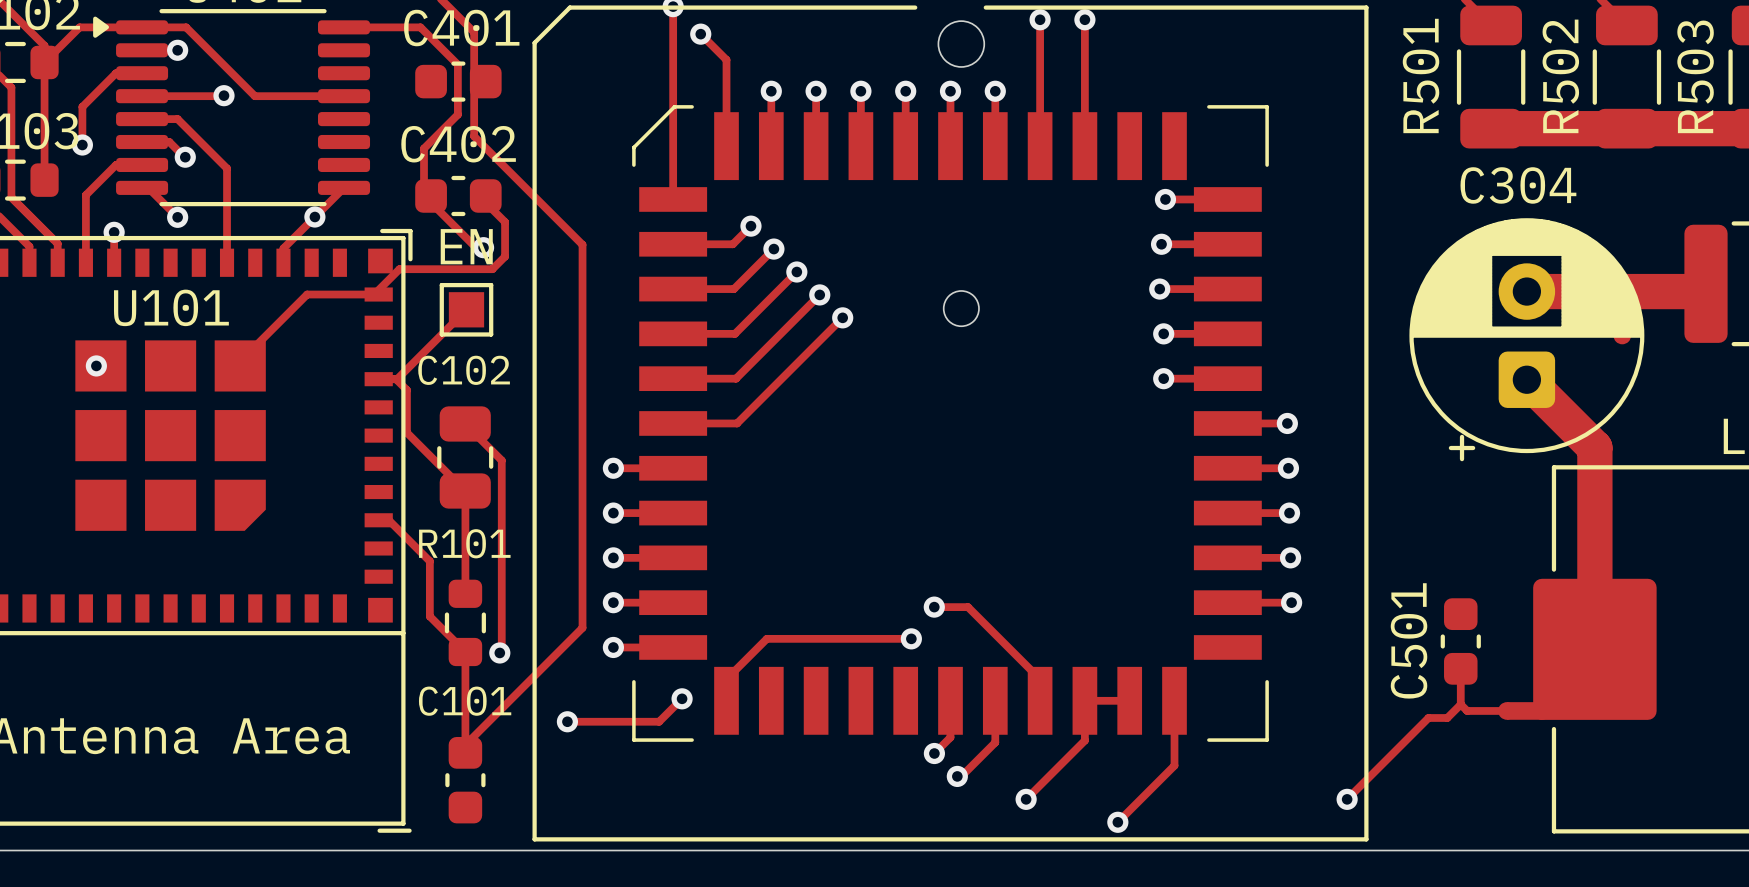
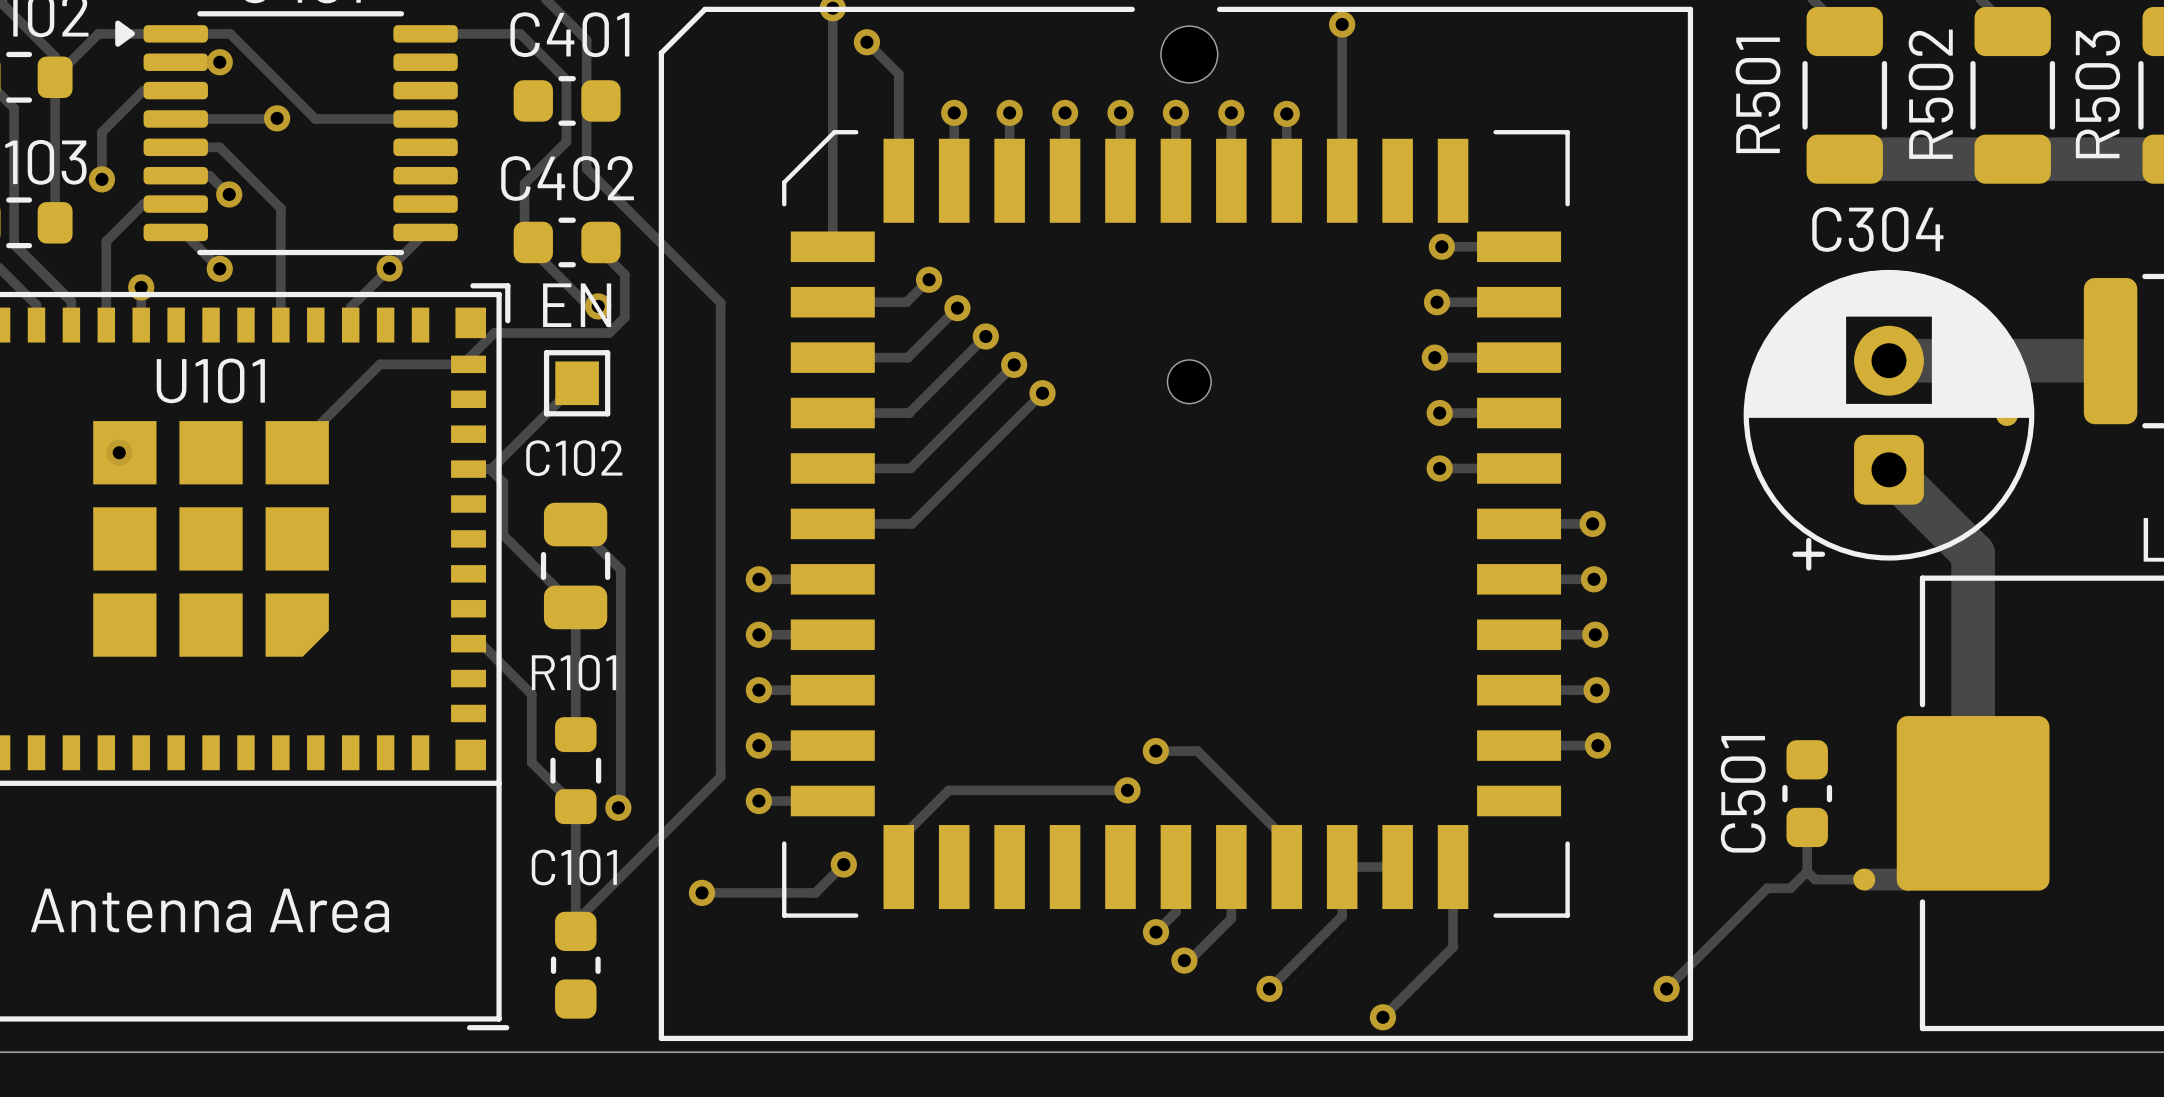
track: (1040, 19) (1040, 92) -> none
via position: (1040, 19) -> (1286, 113)

